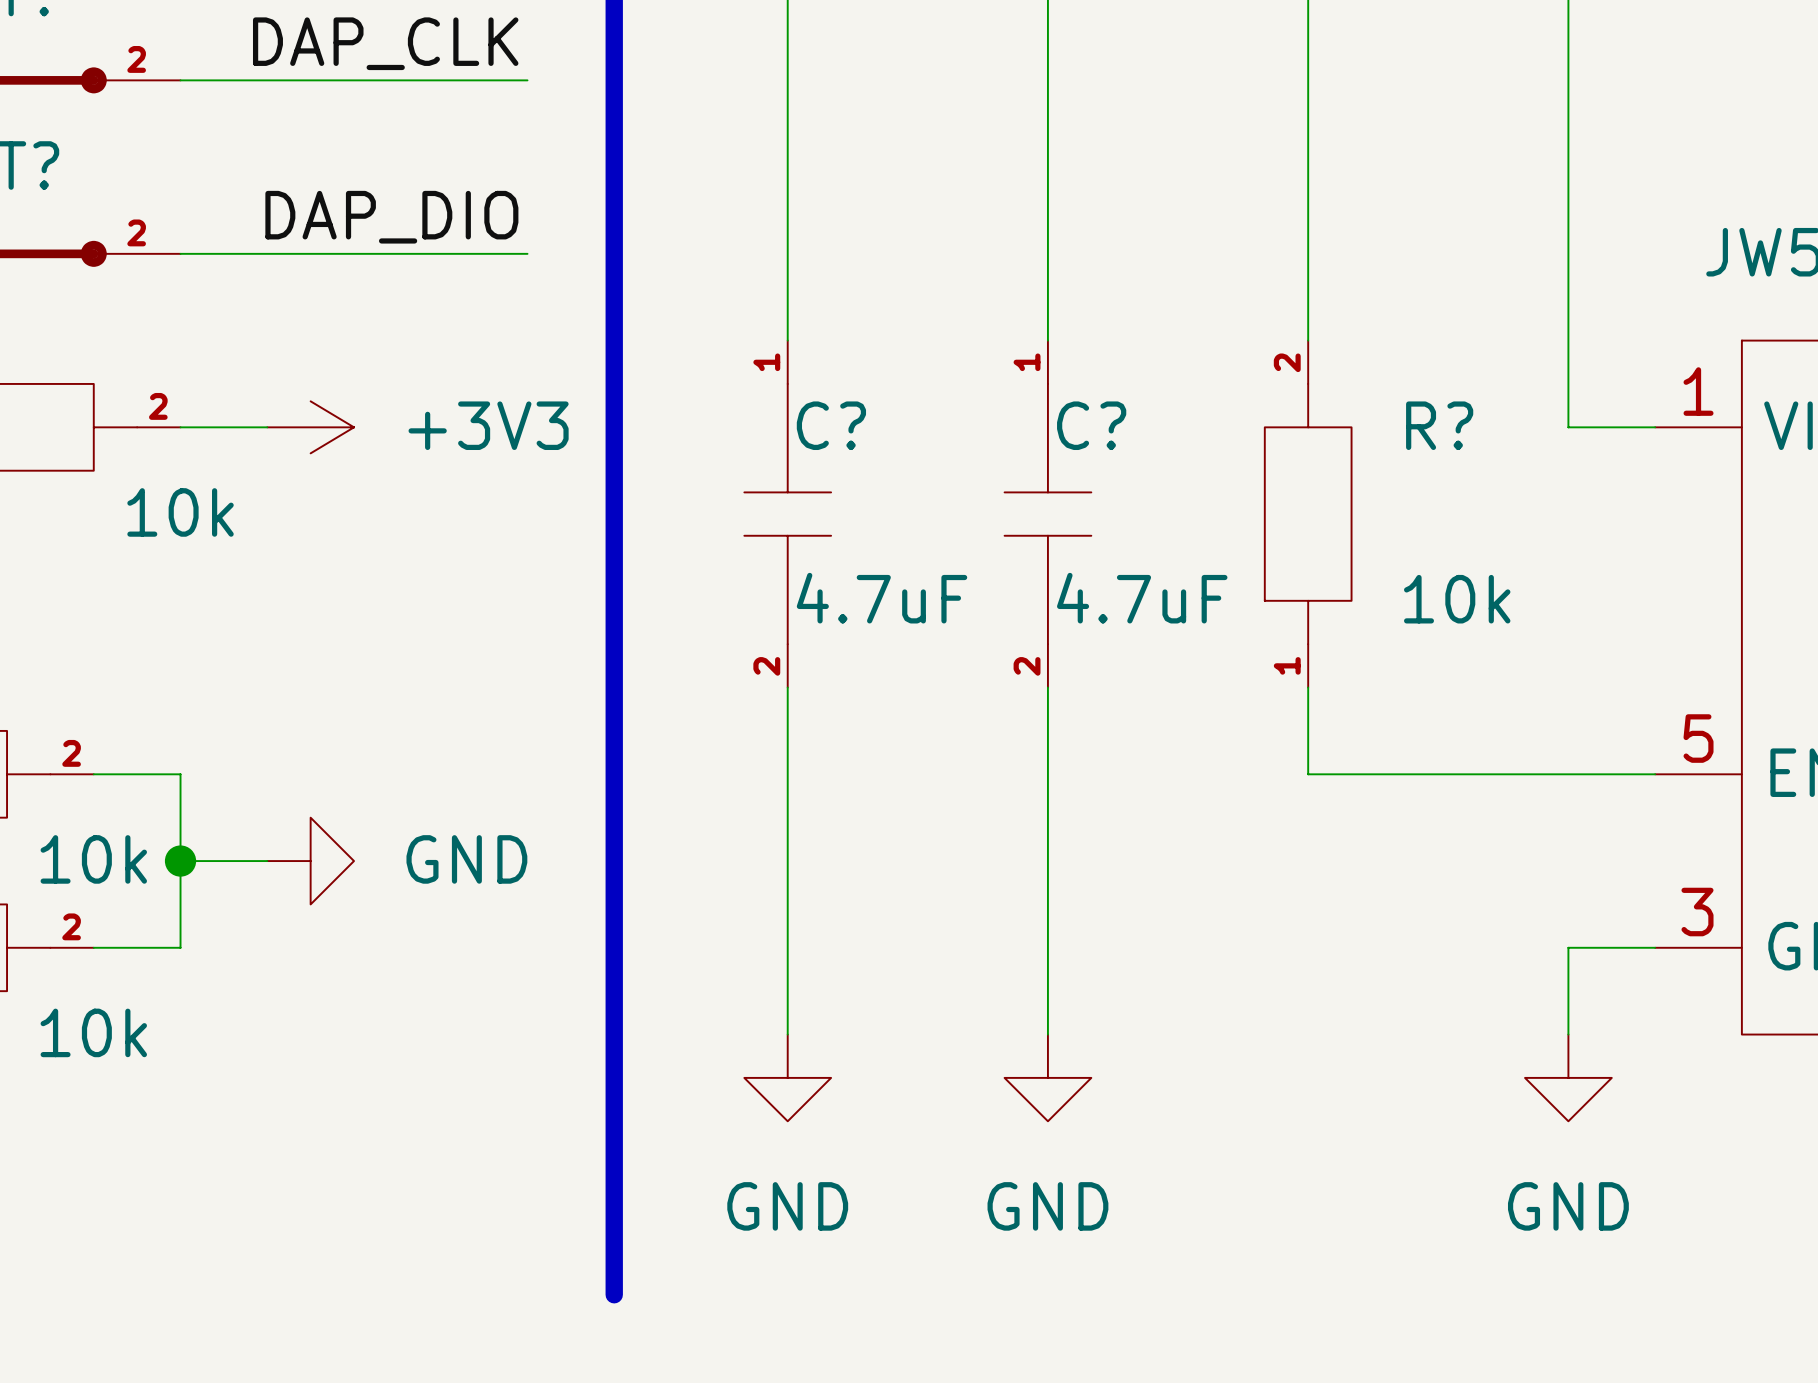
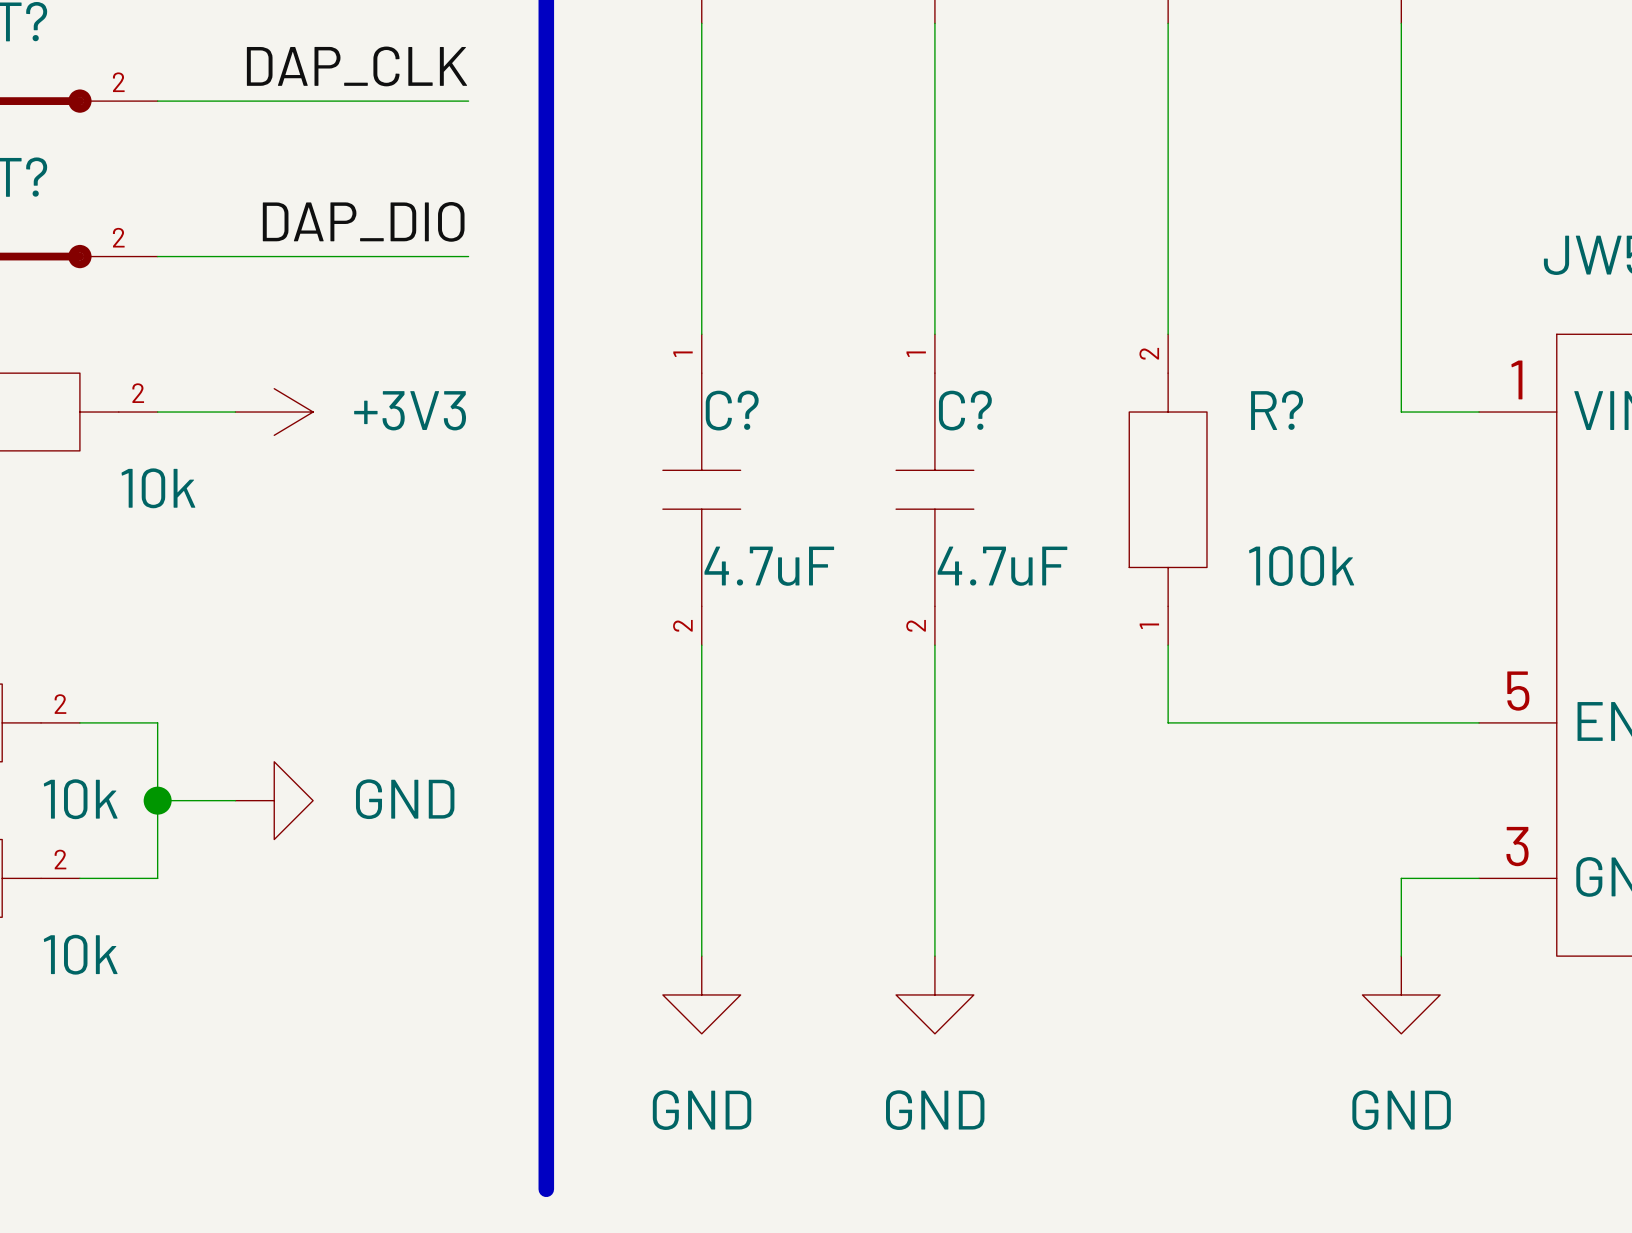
R? value: 10k (1457, 599) -> 100k (1301, 566)

